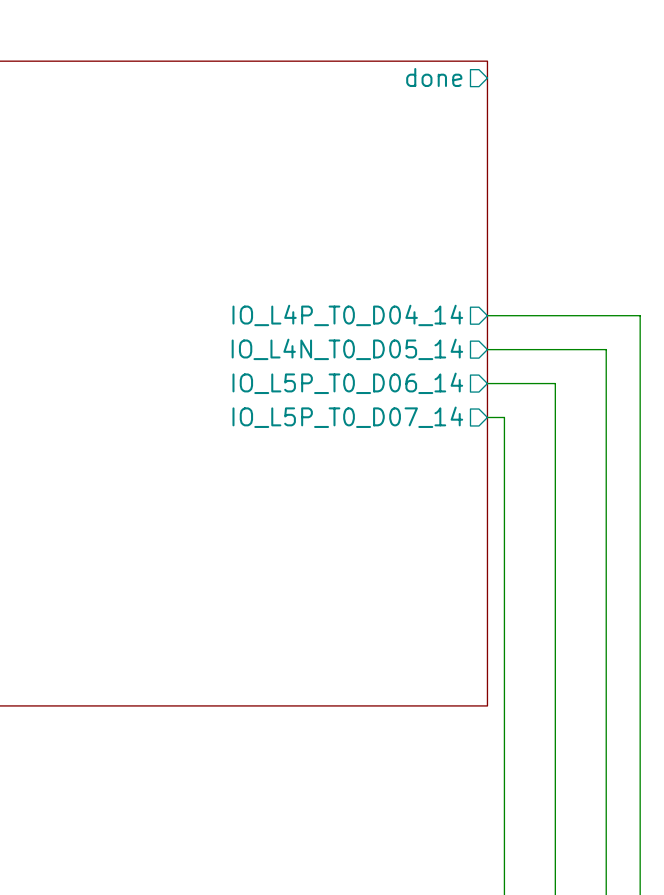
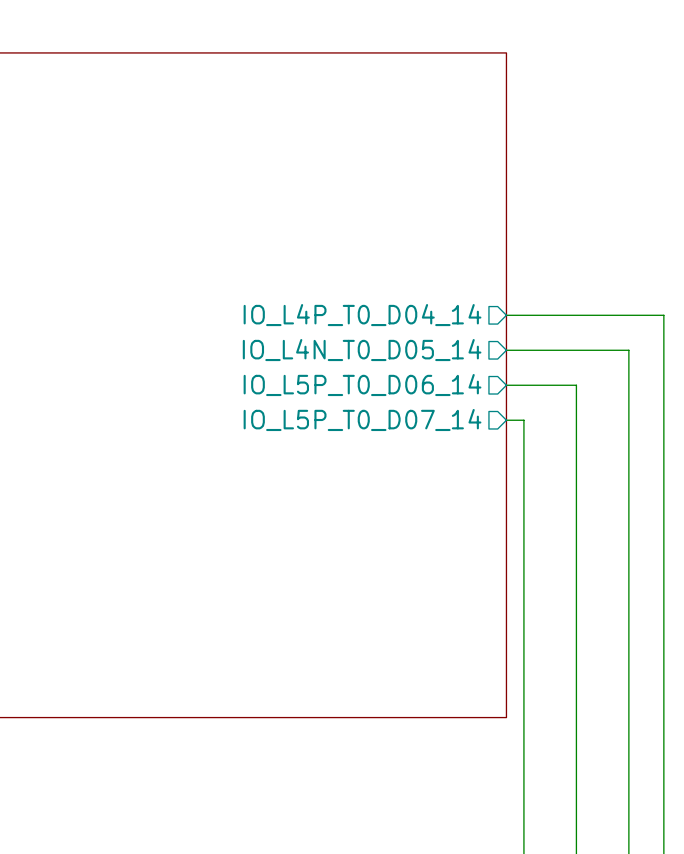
sheet pin: done (434, 77) -> none

